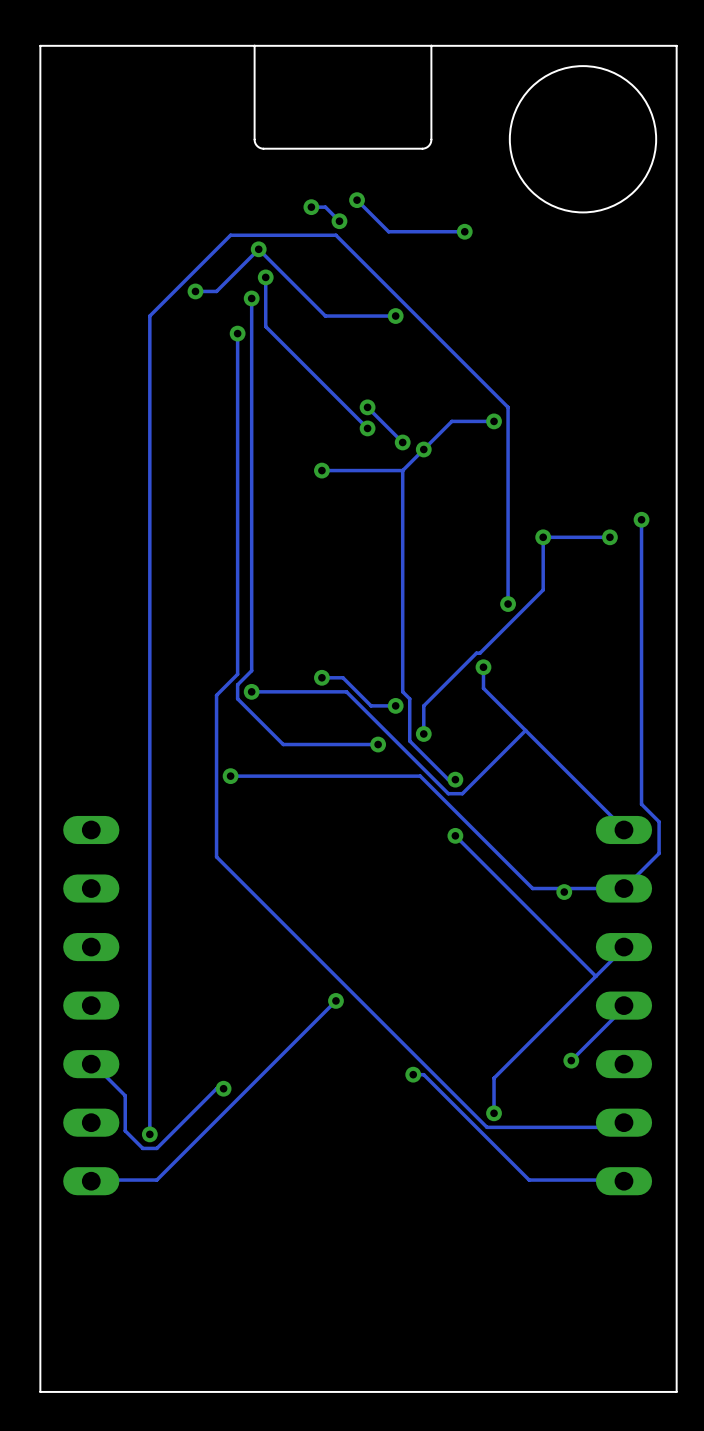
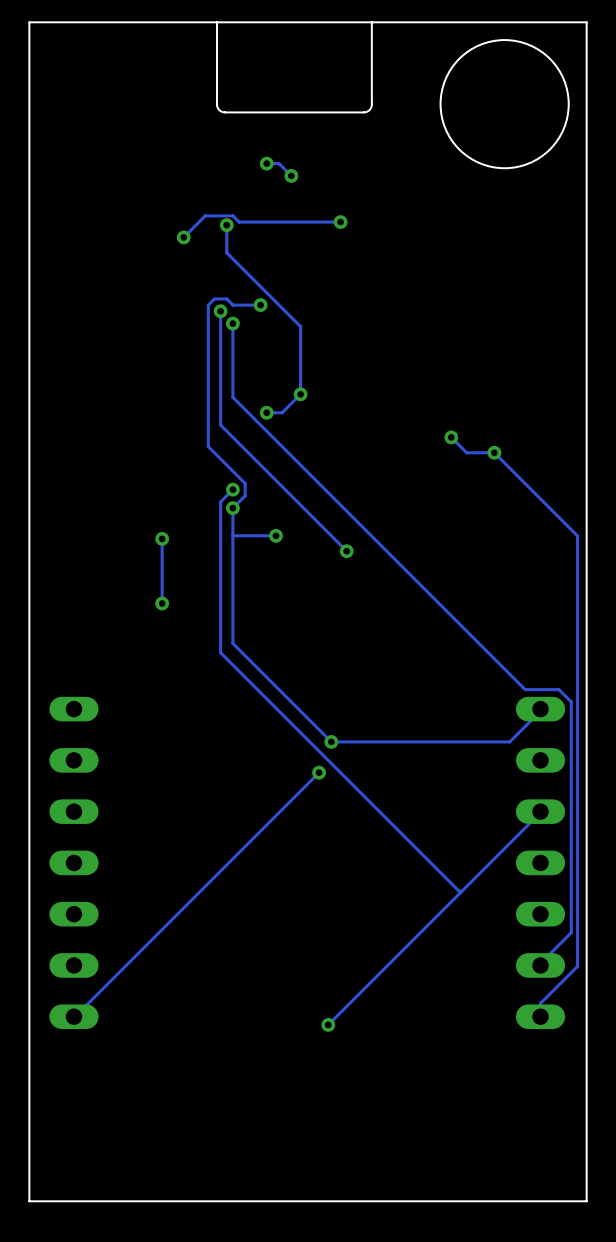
track: (357, 200) (388, 231) (464, 231) -> none
via: (357, 200) -> none
via: (464, 231) -> none
via: (258, 249) -> none
track: (241, 266) (258, 249) (325, 316) (395, 316) -> (205, 215) (232, 215) (239, 222) (340, 222)
via: none -> (340, 222)
via: (195, 291) -> none
track: (216, 291) (195, 291) -> none
via: none -> (183, 237)
track: (251, 298) (251, 670) (237, 684) (237, 698) (283, 744) (378, 744) -> none
via: (251, 298) -> none
track: (265, 309) (265, 326) (367, 428) -> (226, 252) (300, 326) (300, 394) (282, 412) (266, 412)
via: (395, 316) -> none
track: (237, 333) (237, 674) (216, 695) (216, 856) (487, 1127) (620, 1127) (623, 1122) -> none
via: (237, 333) -> none
via: none -> (260, 305)
track: none -> (220, 311) (220, 425) (346, 551)
via: none -> (220, 311)
via: none -> (232, 323)
track: (367, 407) (402, 442) -> none
via: (367, 407) -> none
track: (494, 421) (451, 421) (402, 470) -> none
via: (494, 421) -> none
via: (367, 428) -> none
via: (402, 442) -> none
via: (423, 449) -> none
via: (321, 470) -> none
via: none -> (300, 394)
track: (402, 470) (321, 470) -> none
track: (402, 470) (402, 691) (409, 698) (409, 741) (448, 779) (455, 779) -> none
via: none -> (266, 412)
via: none -> (451, 437)
track: (641, 519) (641, 804) (645, 807) -> (232, 323) (232, 397) (525, 689) (558, 689)
via: (641, 519) -> none
track: (543, 537) (543, 589) (423, 705) (423, 733) -> (469, 452) (466, 452) (451, 437)
via: (543, 537) -> none
via: none -> (494, 452)
track: (609, 537) (571, 537) -> none
via: (609, 537) -> none
track: none -> (232, 489) (220, 501) (220, 652) (460, 892)
via: none -> (232, 489)
via: none -> (232, 508)
track: (508, 604) (508, 407) (335, 235) (230, 235) (149, 316) (149, 1134) -> none
via: (508, 604) -> none
track: none -> (275, 535) (232, 535)
via: none -> (275, 535)
track: none -> (162, 538) (162, 603)
via: none -> (162, 538)
via: none -> (346, 551)
track: (483, 667) (483, 688) (623, 829) -> (260, 305) (232, 305) (226, 298) (214, 298) (208, 305) (208, 446) (245, 483) (245, 495) (232, 508) (232, 643) (331, 741) (509, 741) (540, 709)
via: (483, 667) -> none
track: (321, 677) (343, 677) (371, 705) (395, 705) -> none
via: (321, 677) -> none
track: (251, 691) (346, 691) (448, 793) (462, 793) (525, 730) -> none
via: (251, 691) -> none
via: (395, 705) -> none
via: none -> (162, 603)
via: (423, 733) -> none
via: (378, 744) -> none
track: (230, 776) (420, 776) (532, 888) (623, 888) (659, 853) -> (540, 965) (571, 932) (571, 729)
via: (230, 776) -> none
via: (455, 779) -> none
track: (455, 835) (595, 976) -> none
via: (455, 835) -> none
via: none -> (331, 741)
via: (564, 892) -> none
via: none -> (319, 772)
track: (335, 1000) (156, 1180) (93, 1180) -> (319, 772) (76, 1015)
via: (335, 1000) -> none
track: (623, 1005) (623, 1007) (571, 1060) -> none
via: (571, 1060) -> none
track: (91, 1064) (93, 1064) (125, 1095) (125, 1130) (142, 1148) (156, 1148) (216, 1088) (223, 1088) -> none
track: (413, 1074) (423, 1074) (529, 1180) (623, 1180) -> (494, 452) (577, 535) (577, 966) (540, 1003) (540, 1015)
via: (413, 1074) -> none
track: (494, 1078) (494, 1113) -> (426, 926) (328, 1024)
via: (223, 1088) -> none
via: (494, 1113) -> none
via: (149, 1134) -> none
via: none -> (328, 1024)

